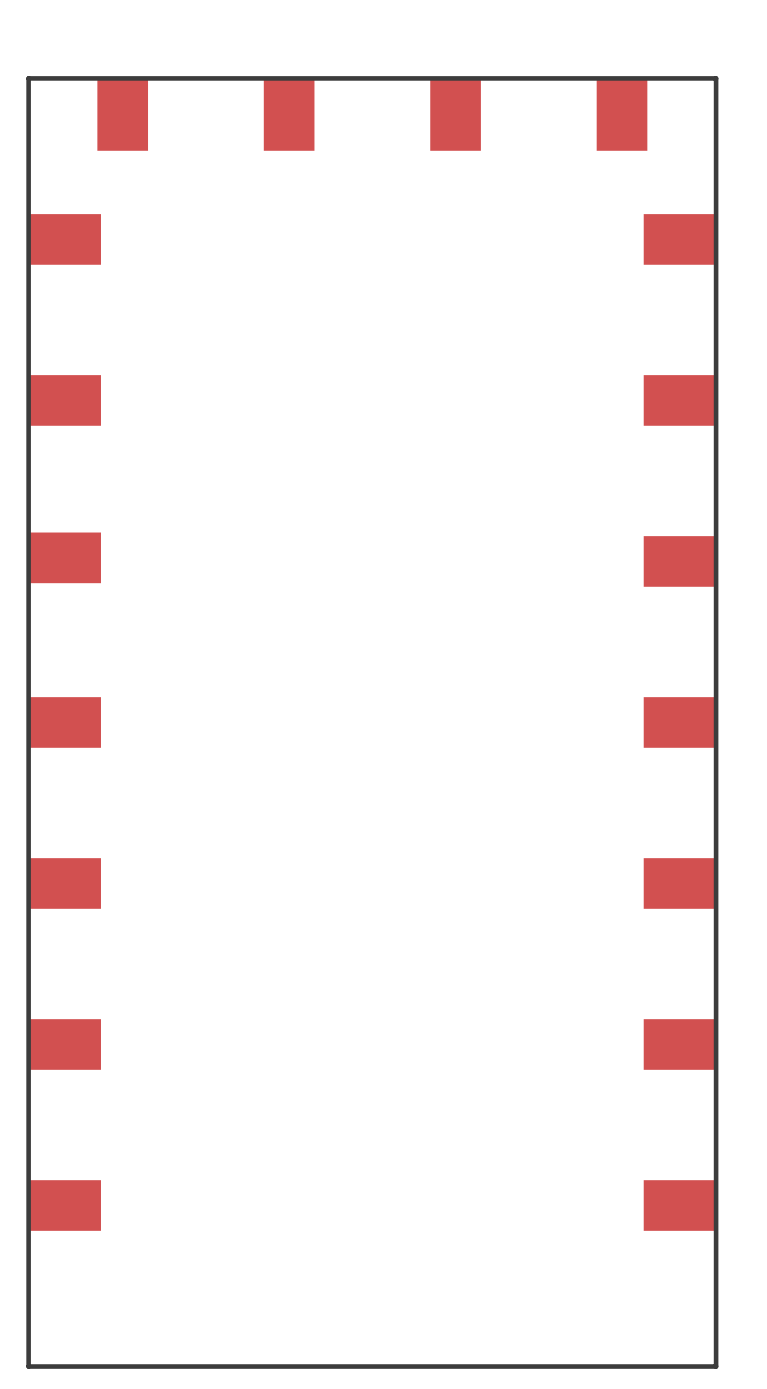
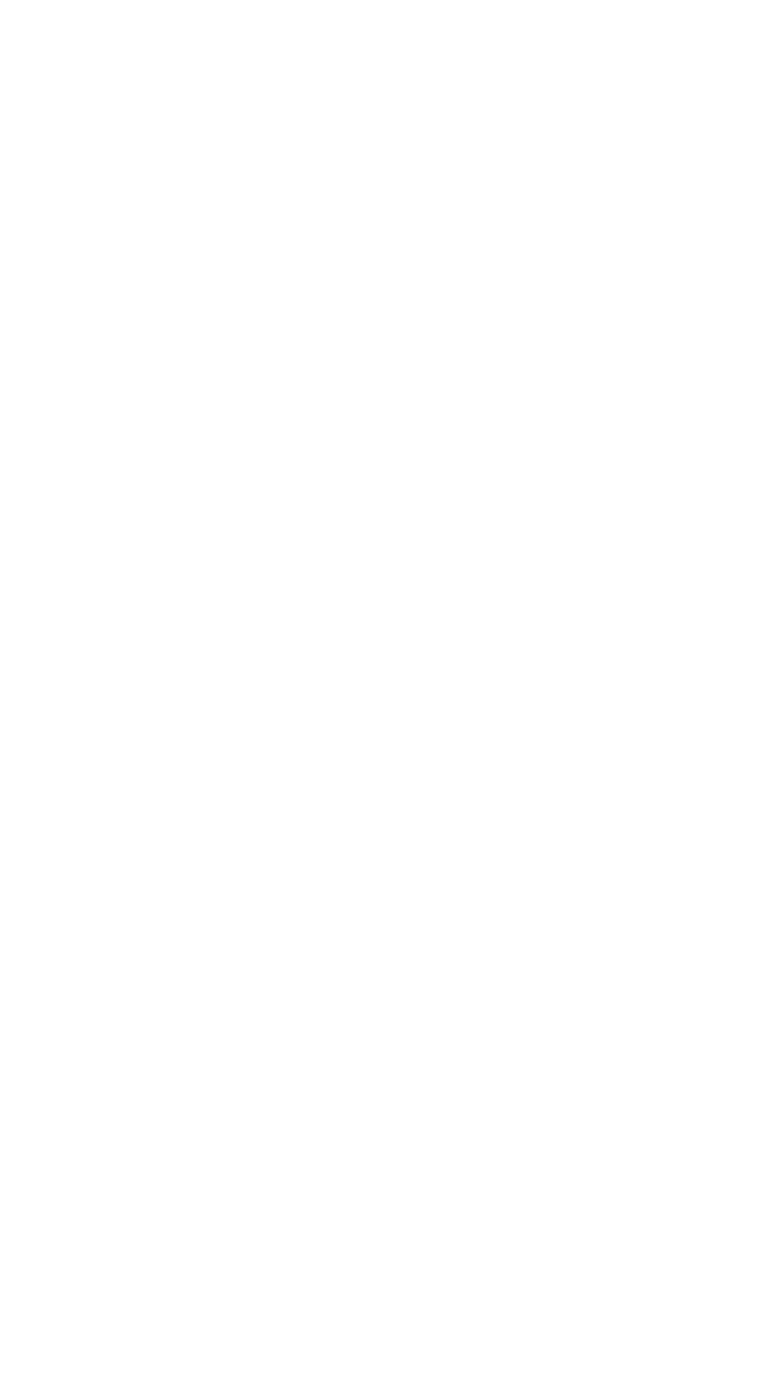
part: (372, 722) -> none

